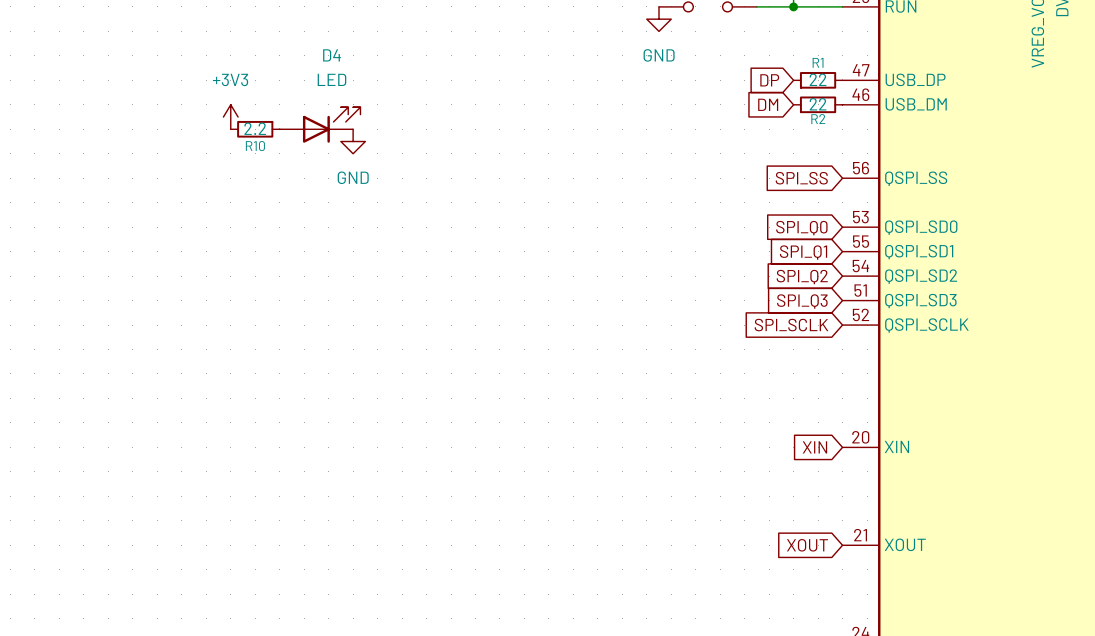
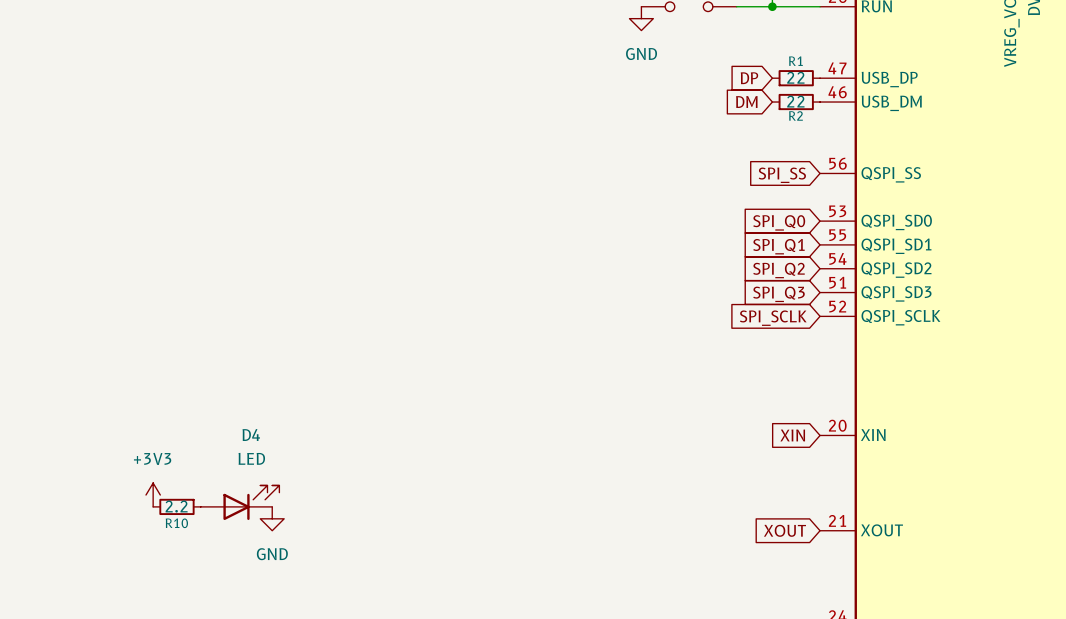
power symbol: +3V3 (230, 117) -> none
D4 position: (320, 125) -> (240, 502)
R10 position: (255, 129) -> (176, 506)
power symbol: GND (353, 141) -> none
power symbol: none -> +3V3 (153, 495)
power symbol: none -> GND (272, 518)

